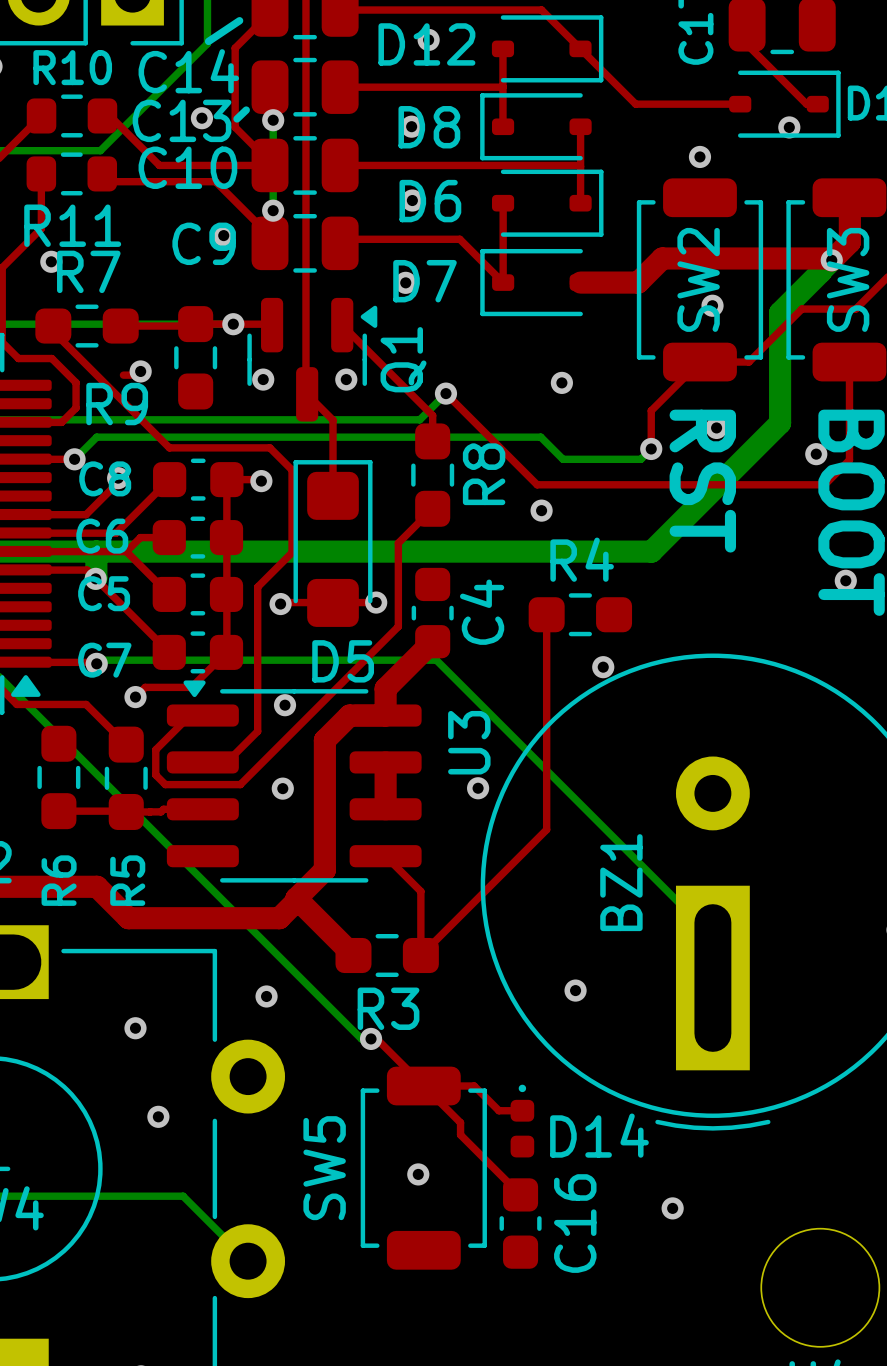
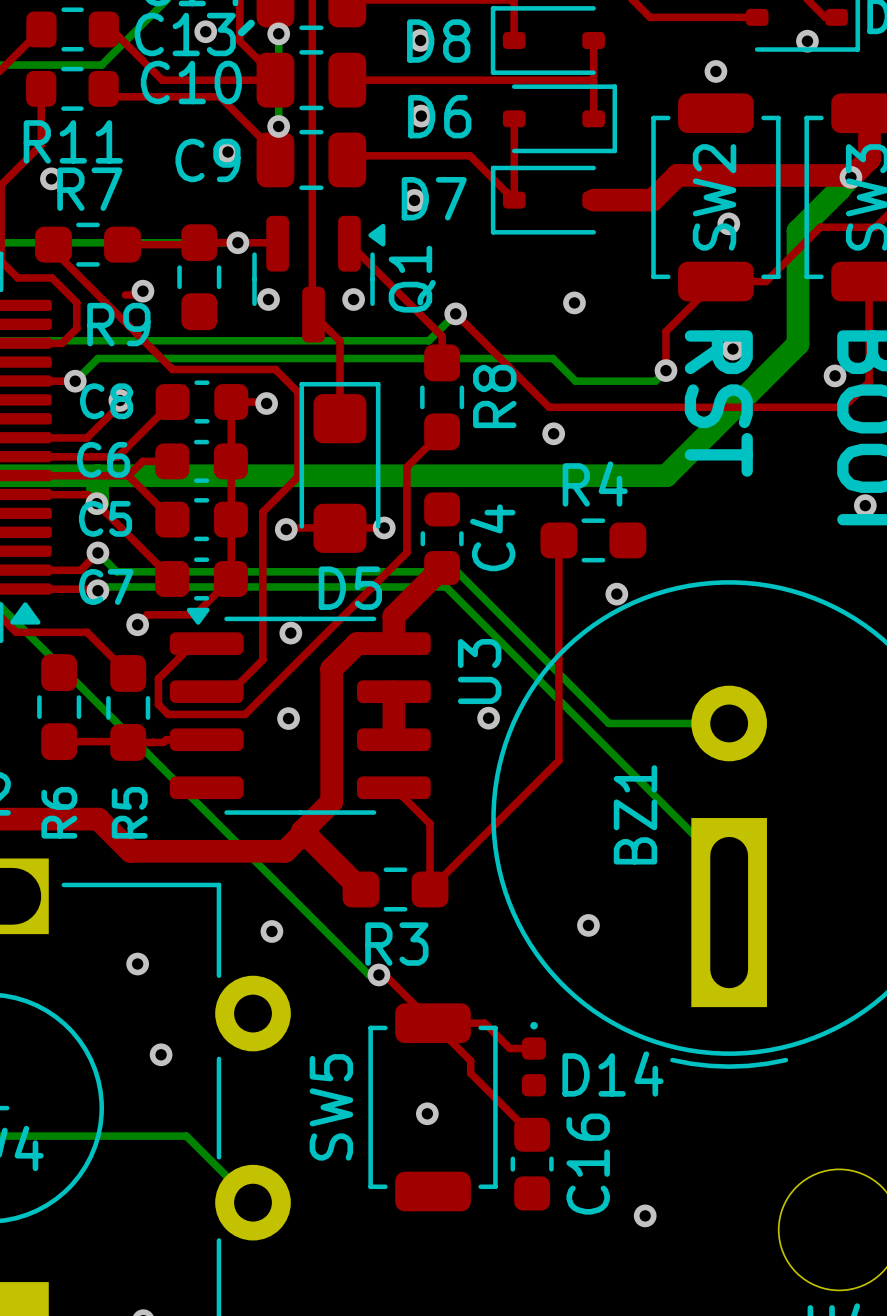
top track: none -> (97, 552) (80, 570) (22, 570)
bottom track: none -> (97, 552) (116, 571) (457, 571) (608, 723) (729, 723)
via: none -> (97, 552)
via position: (672, 1208) -> (645, 1215)

